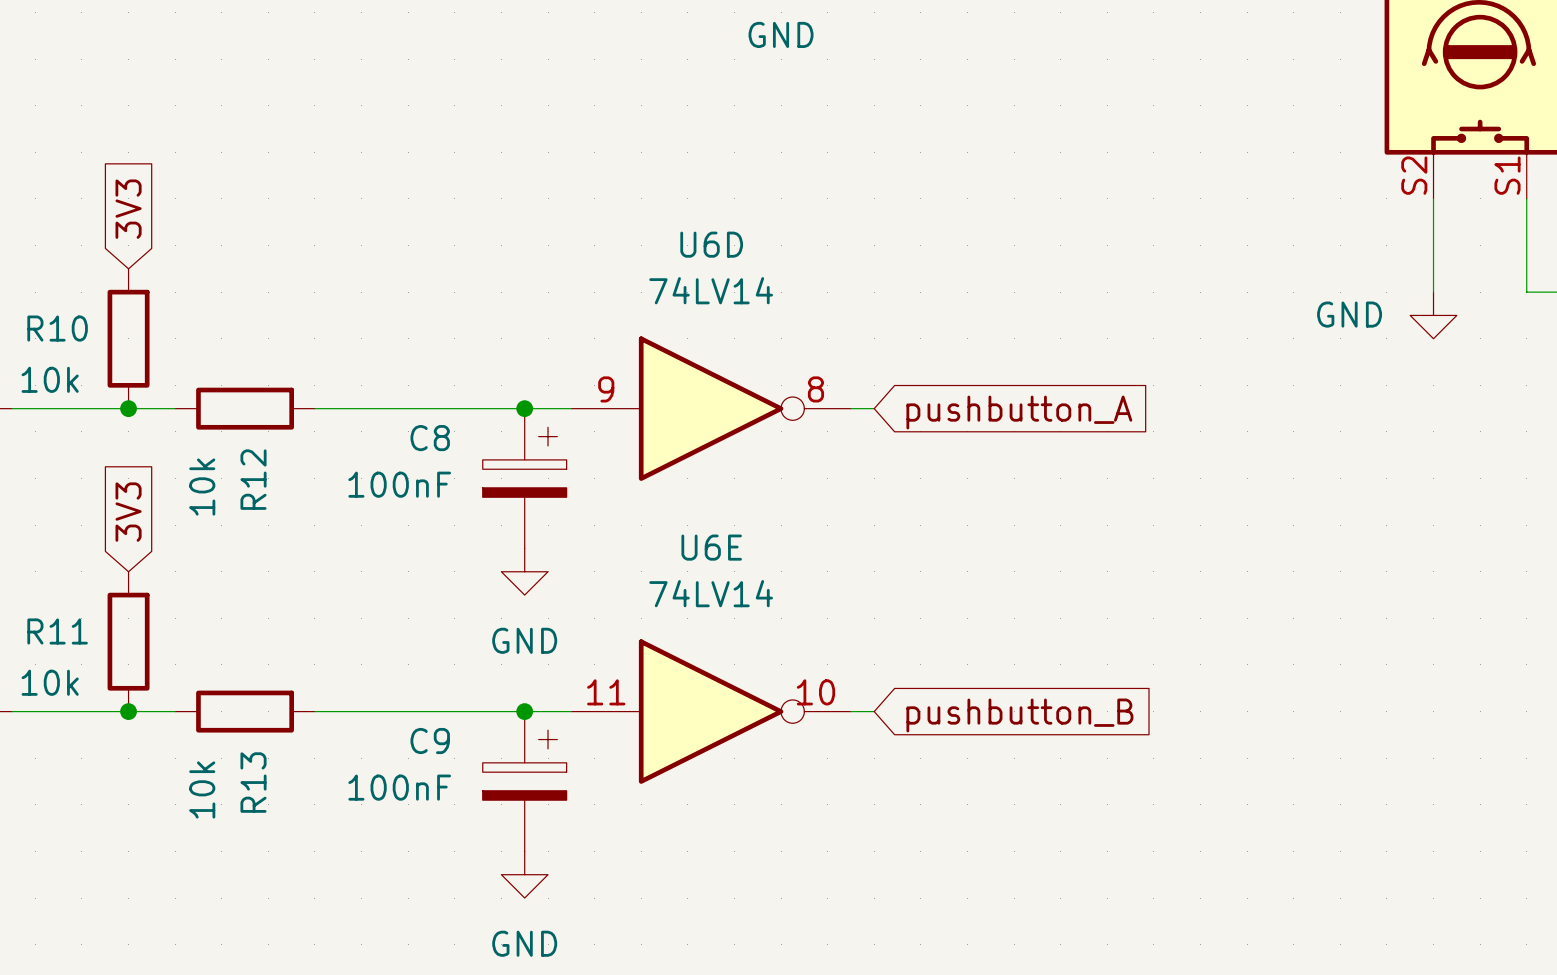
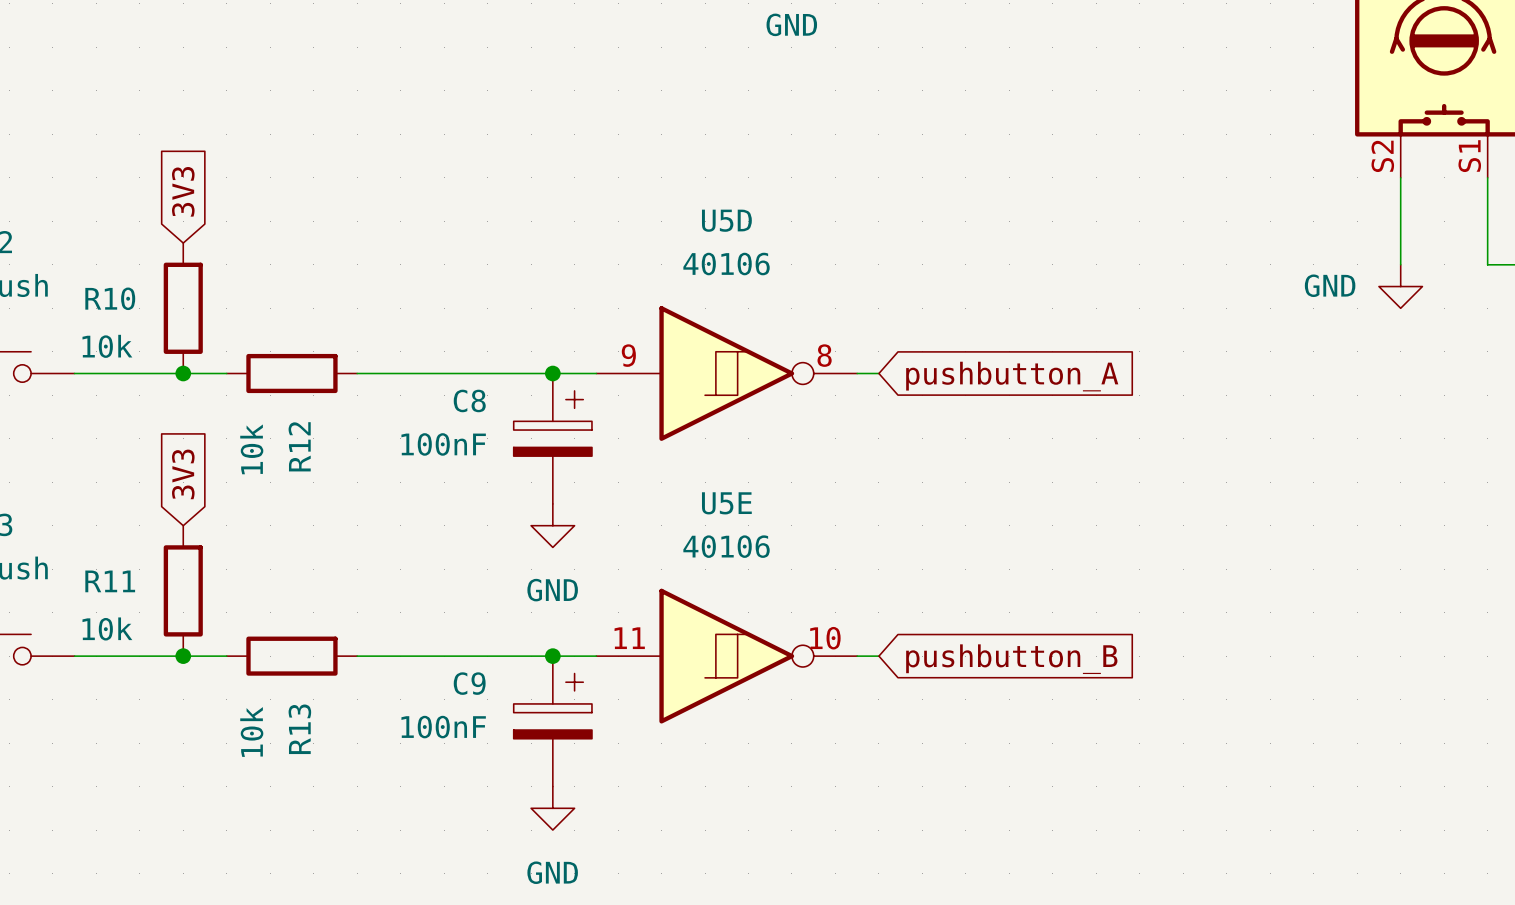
U6D: 74LV14 (711, 408) -> none
U5D: none -> 40106 (726, 373)
U6E: 74LV14 (711, 711) -> none
U5E: none -> 40106 (726, 656)

